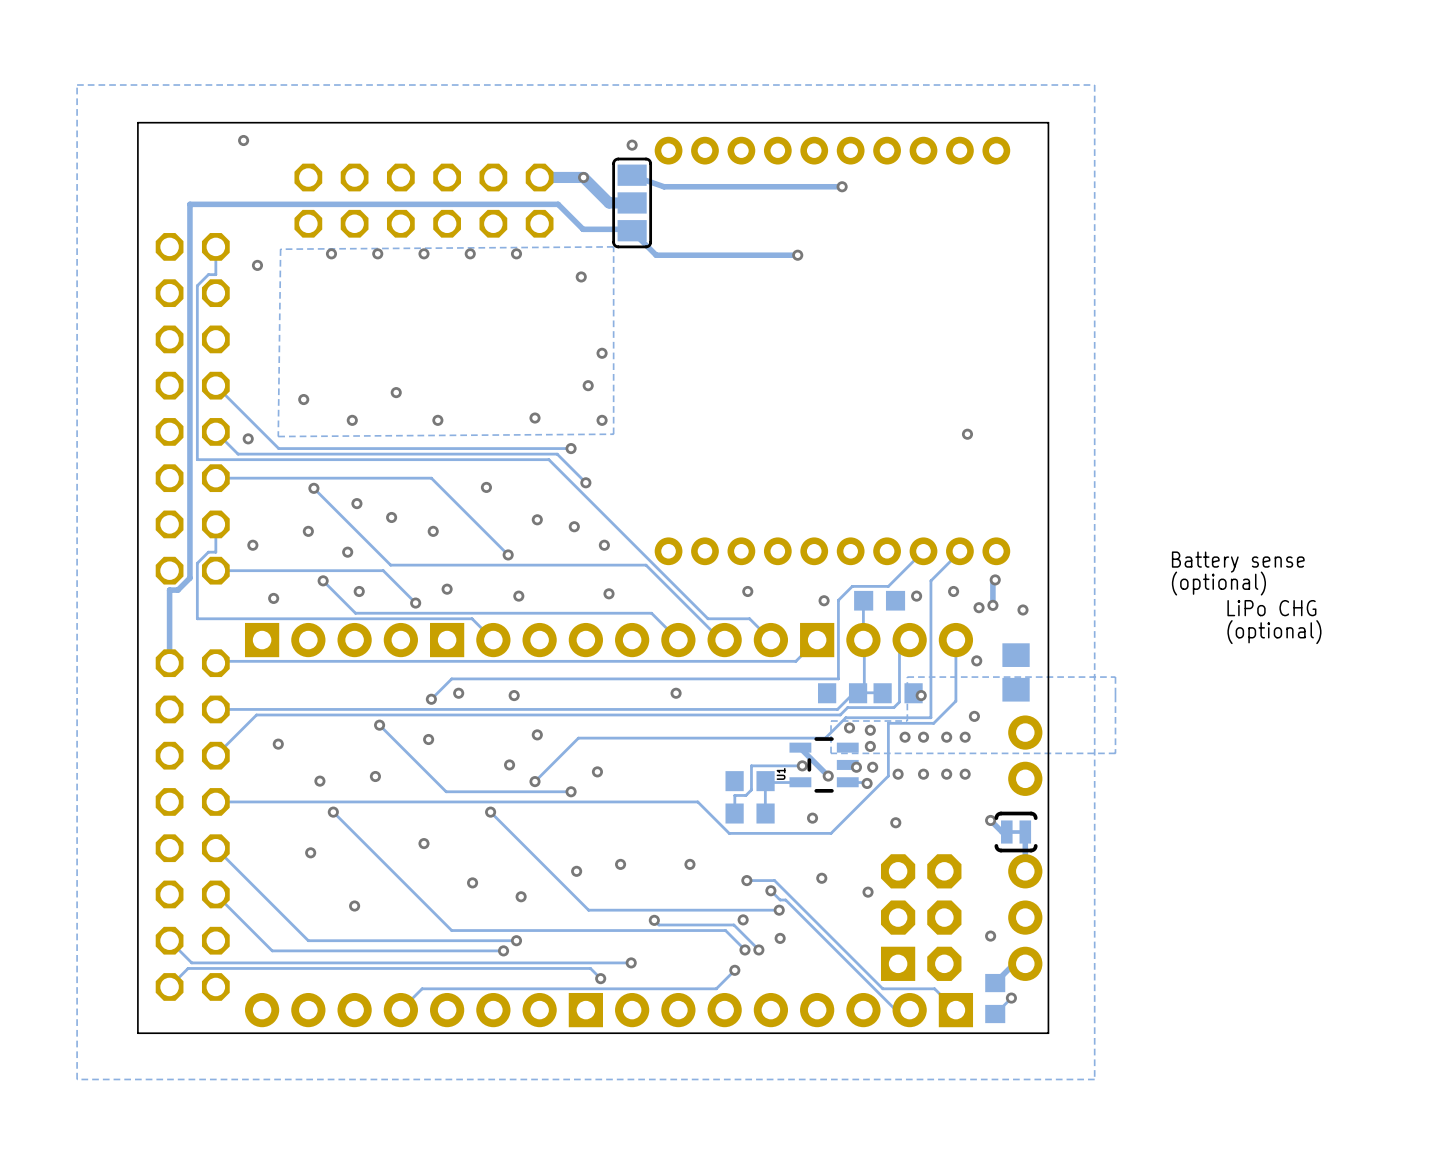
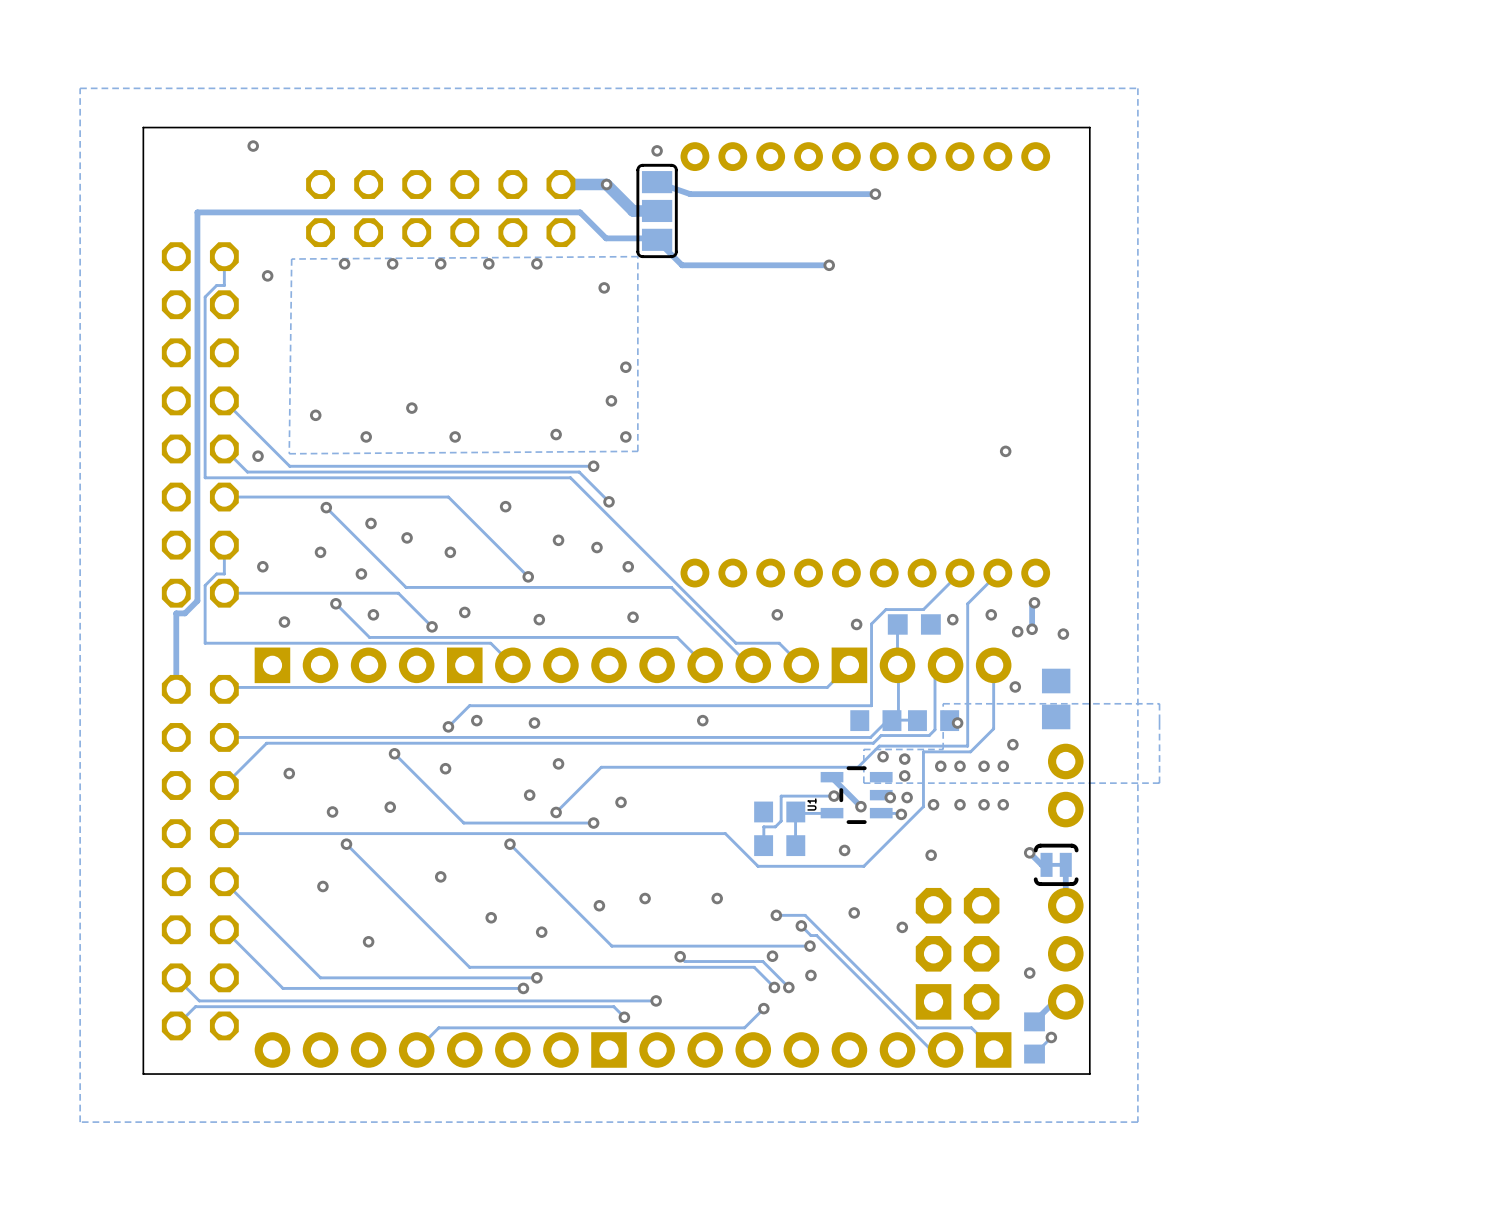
text: Battery sense (1238, 562) -> none
text: (optional) (1218, 583) -> none
text: LiPo CHG (1271, 608) -> none
text: (optional) (1274, 632) -> none

